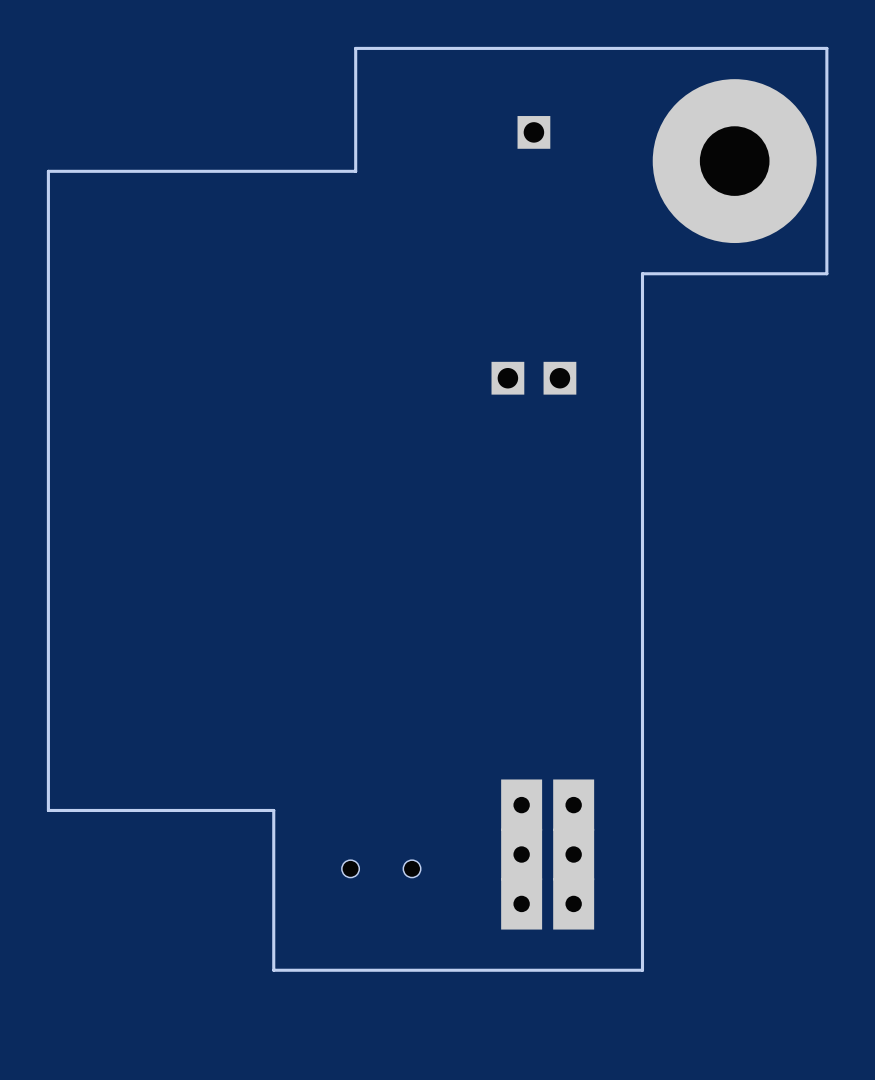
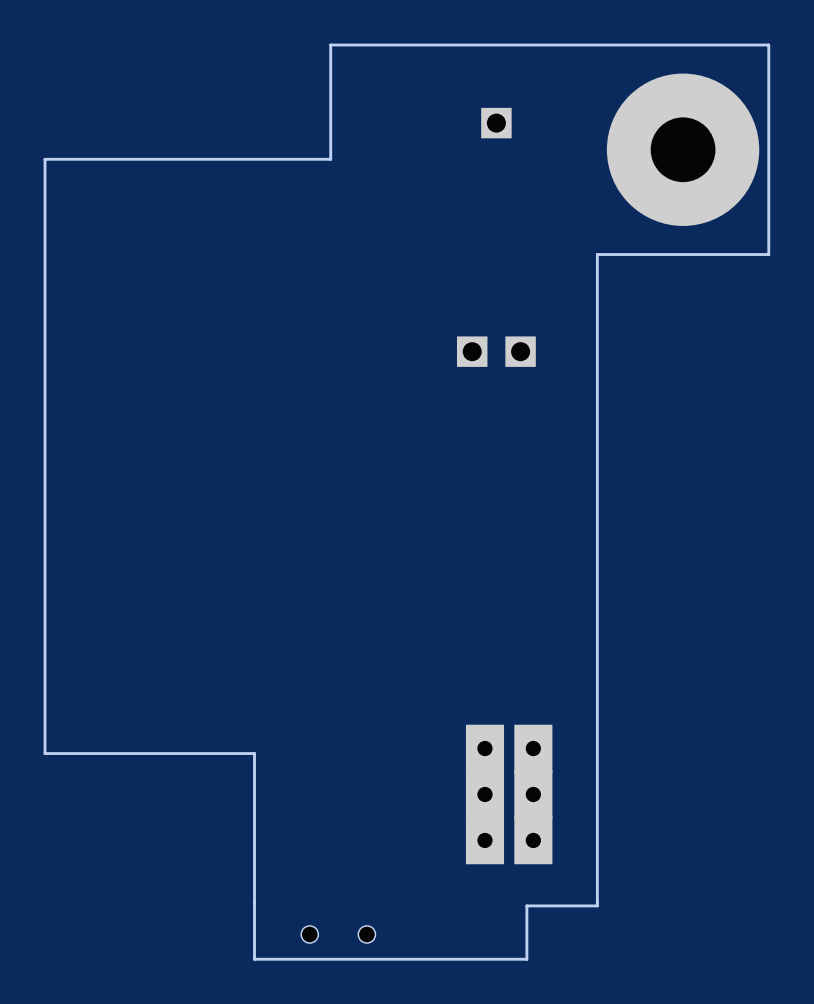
part: (381, 868) -> none
board edge: (642, 970) (273, 970) -> (597, 902) (597, 905) (526, 905) (526, 959) (254, 959) (254, 902)
part: none -> (338, 934)

